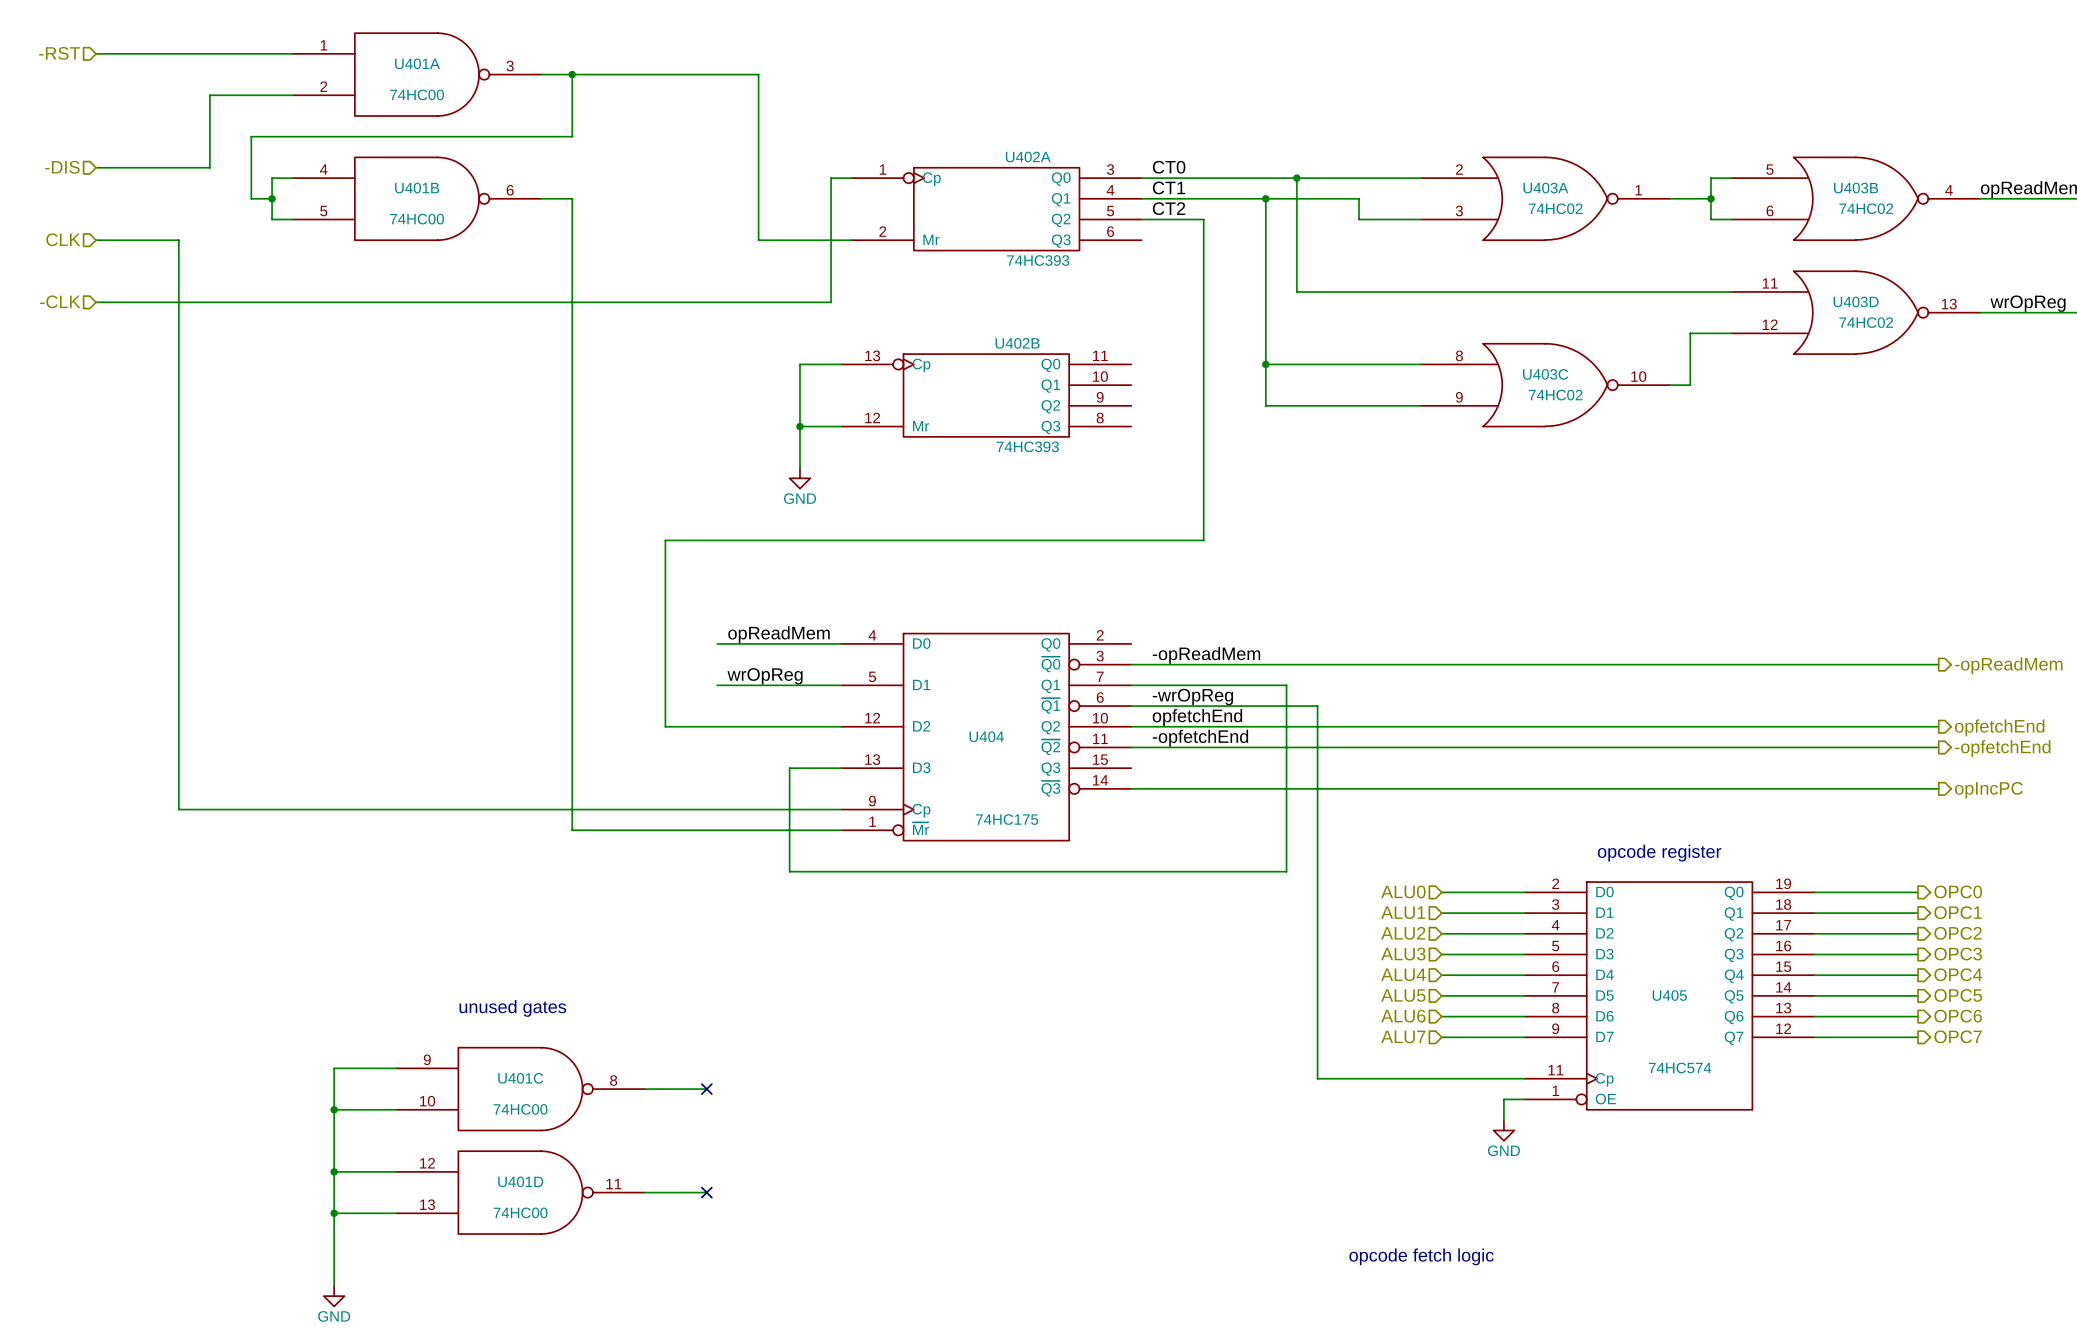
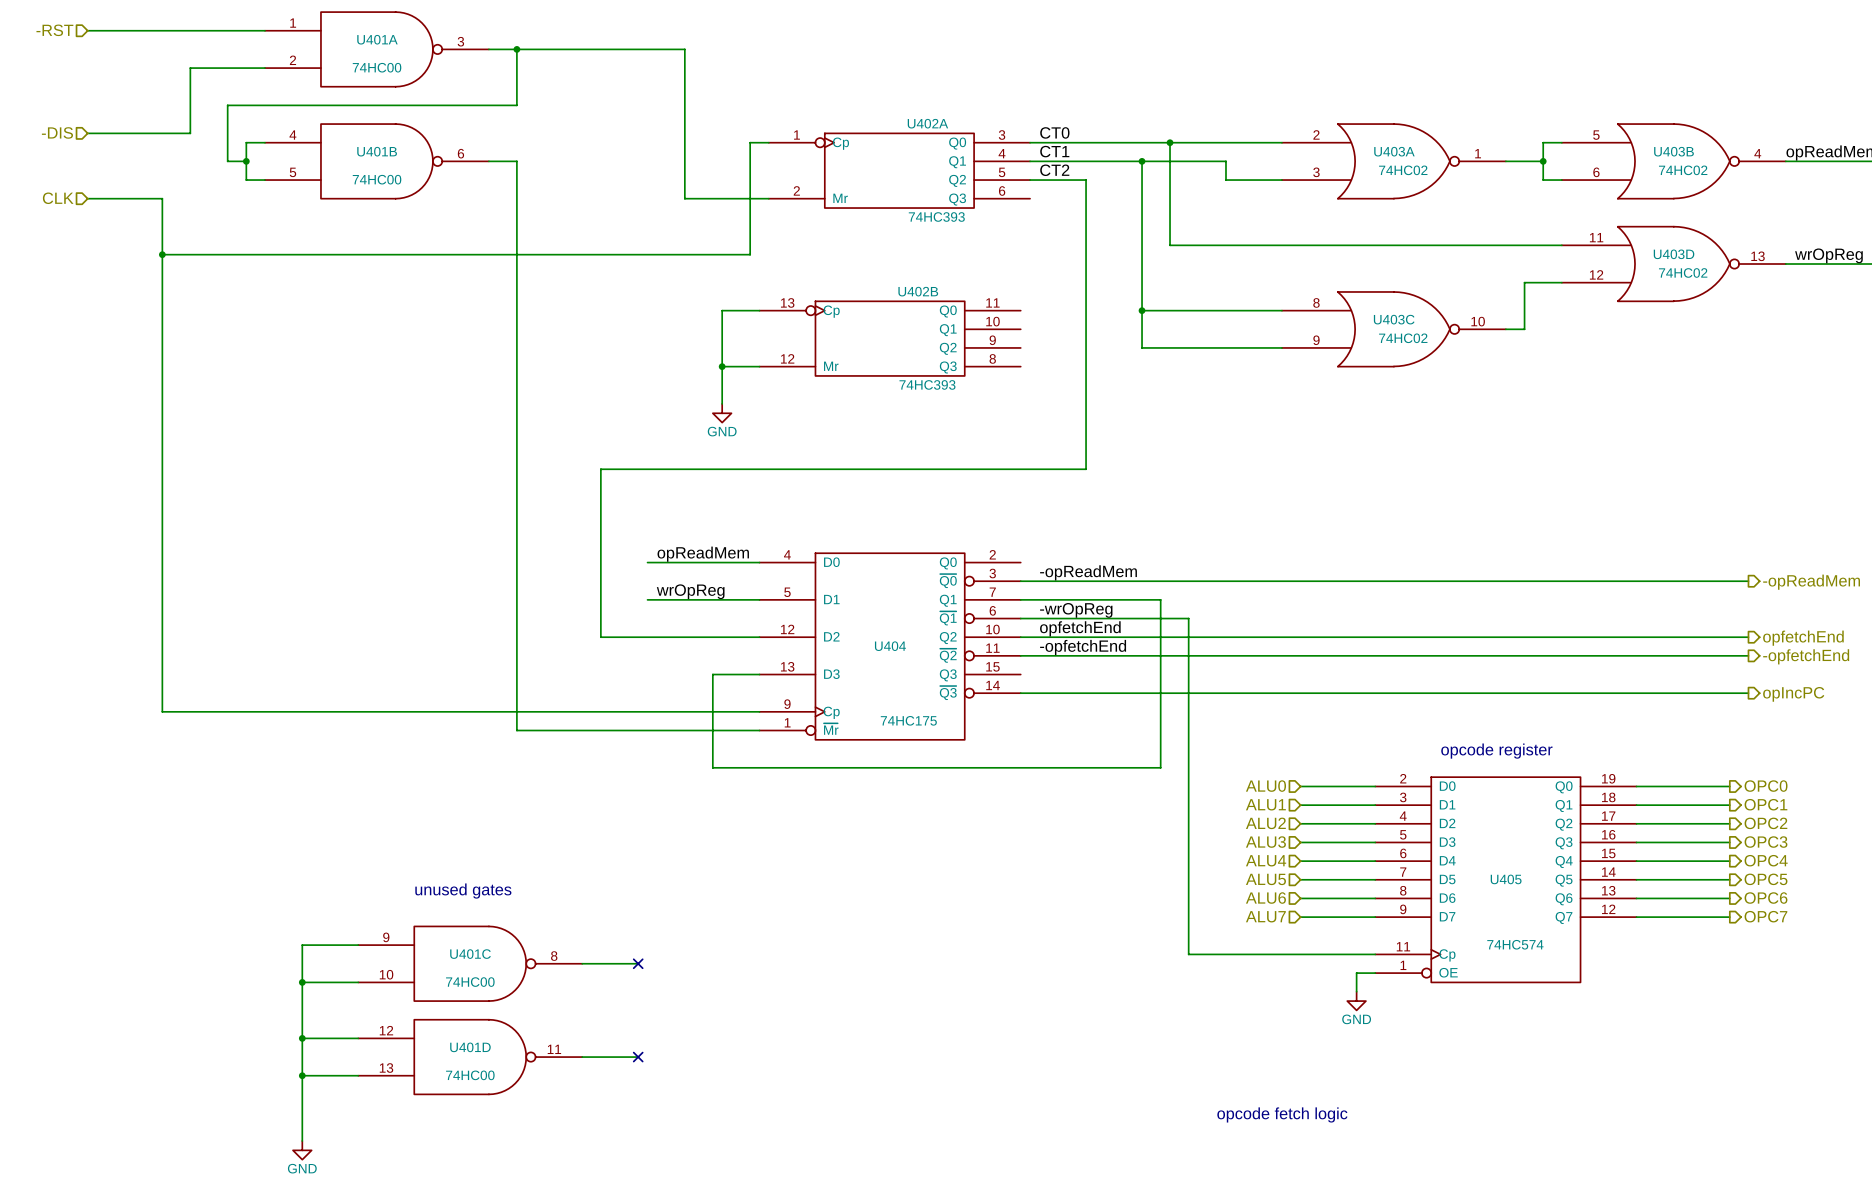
hierarchical label: -CLK (60, 301) -> none
wire: (96, 302) (178, 302) -> none
junction: none -> (162, 254)

